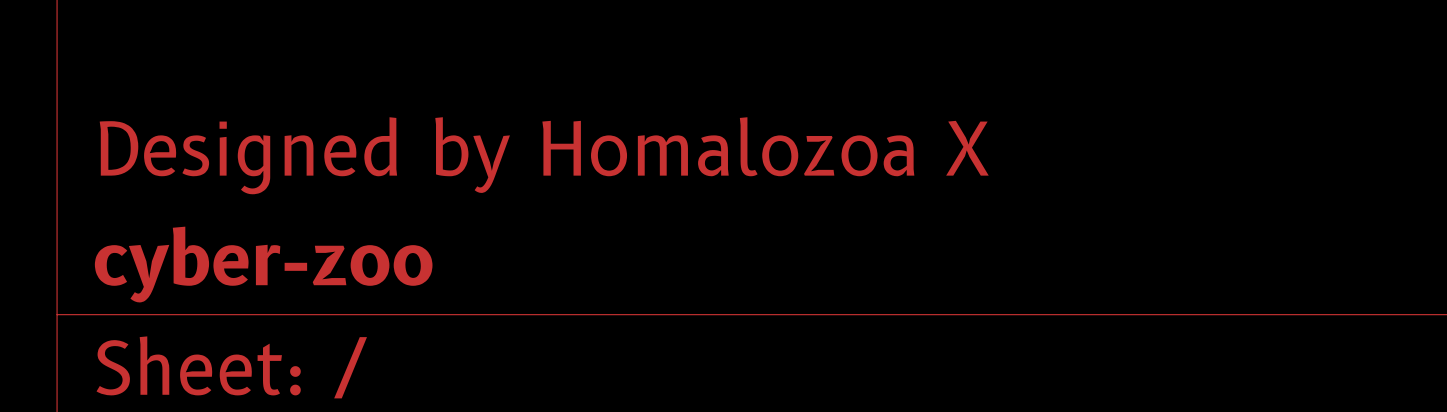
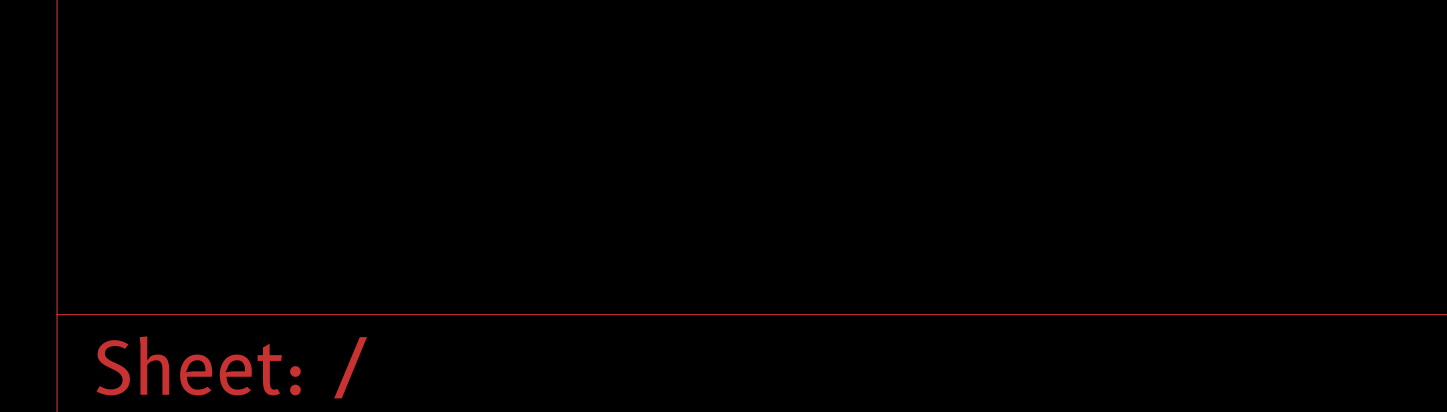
title block: Designed by Homalozoa X (544, 155) -> none
title block: cyber-zoo (263, 264) -> none

